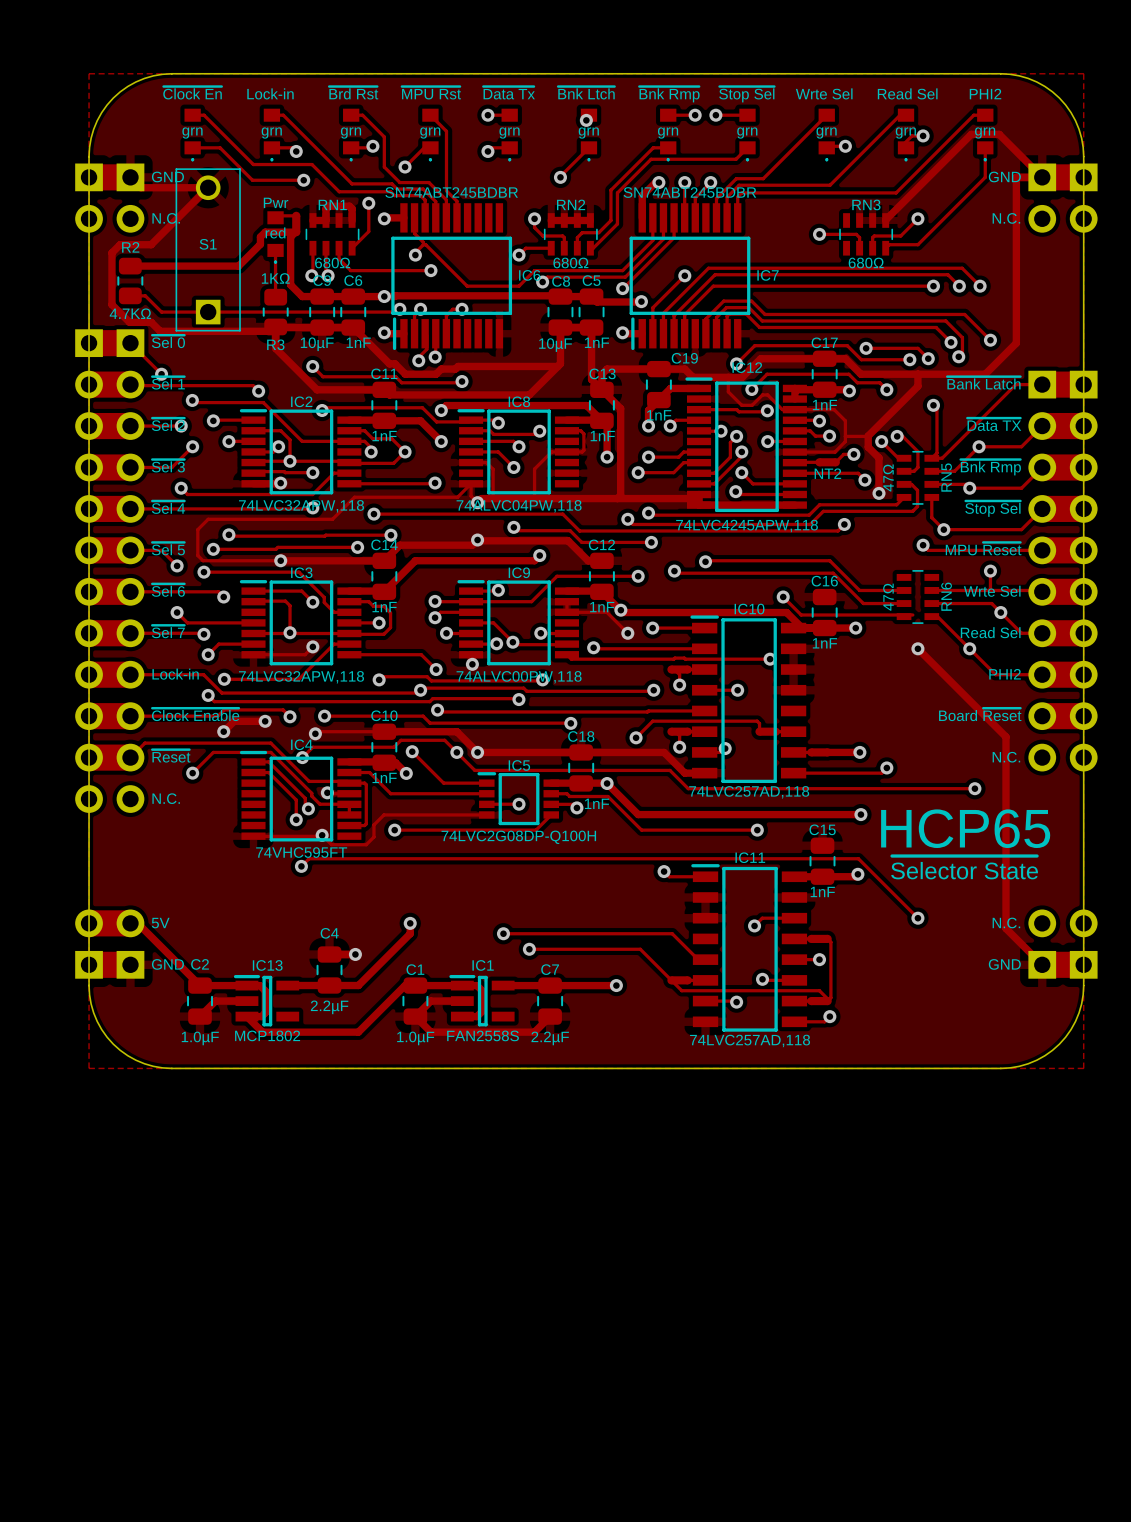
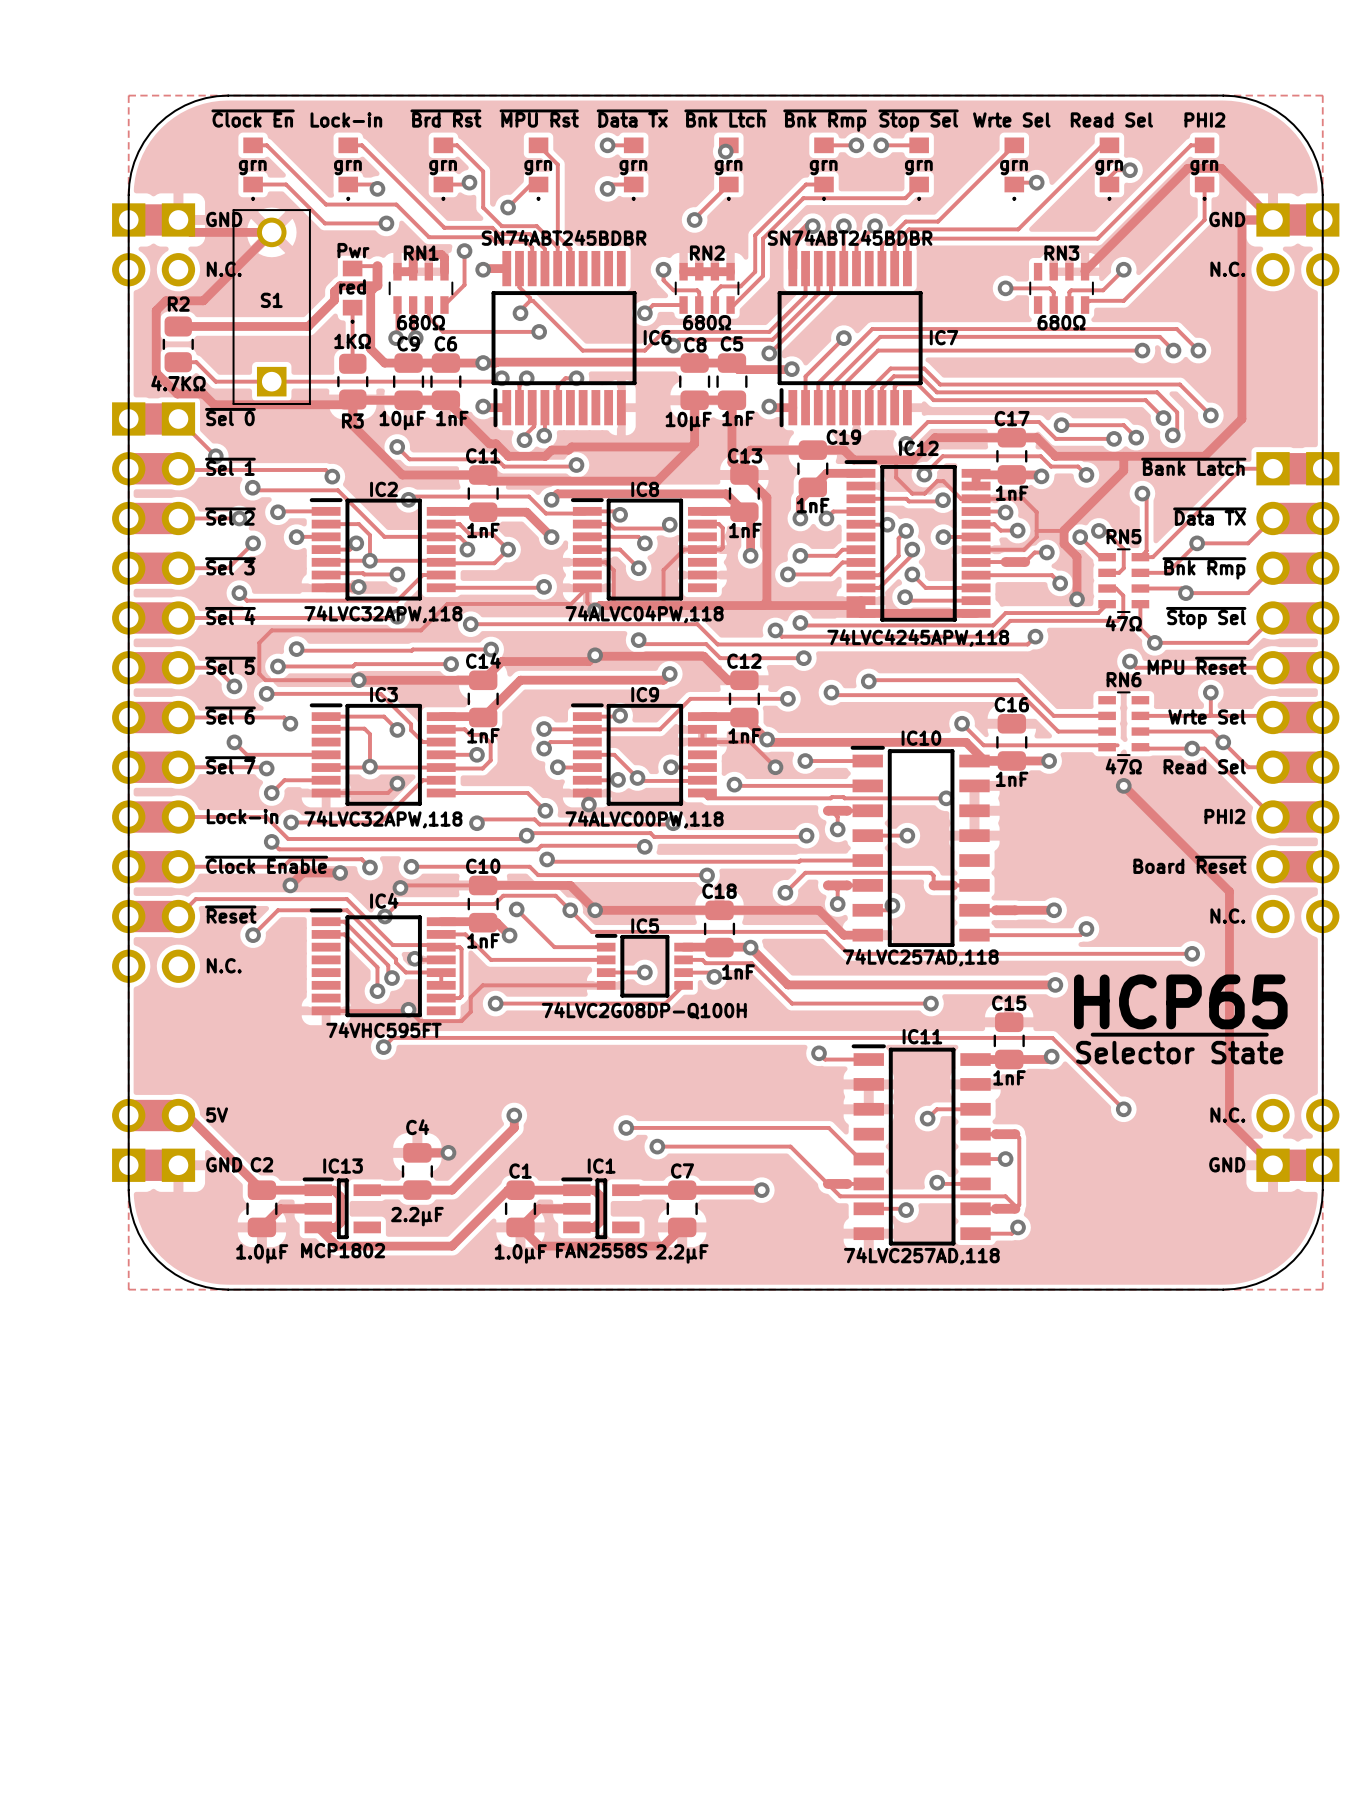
NT2 name: NT2 (827, 473) -> none
RN5 name rotation: 0° (946, 477) -> 90° clockwise (1124, 536)
RN5 name position: RN5 (946, 477) -> RN5 (1124, 536)
RN5 text rotation: 0° (888, 478) -> 90° clockwise (1123, 623)
RN5 text position: 47Ω (888, 478) -> 47Ω (1123, 623)
RN6 name rotation: 0° (946, 596) -> 90° clockwise (1124, 679)
RN6 name position: RN6 (946, 596) -> RN6 (1124, 679)
RN6 text rotation: 0° (888, 597) -> 90° clockwise (1123, 766)
RN6 text position: 47Ω (888, 597) -> 47Ω (1123, 766)
track: (938, 617) (995, 674) (1042, 674) -> (1148, 748) (1204, 748) (1273, 817)
via position: (969, 648) -> (1192, 748)

